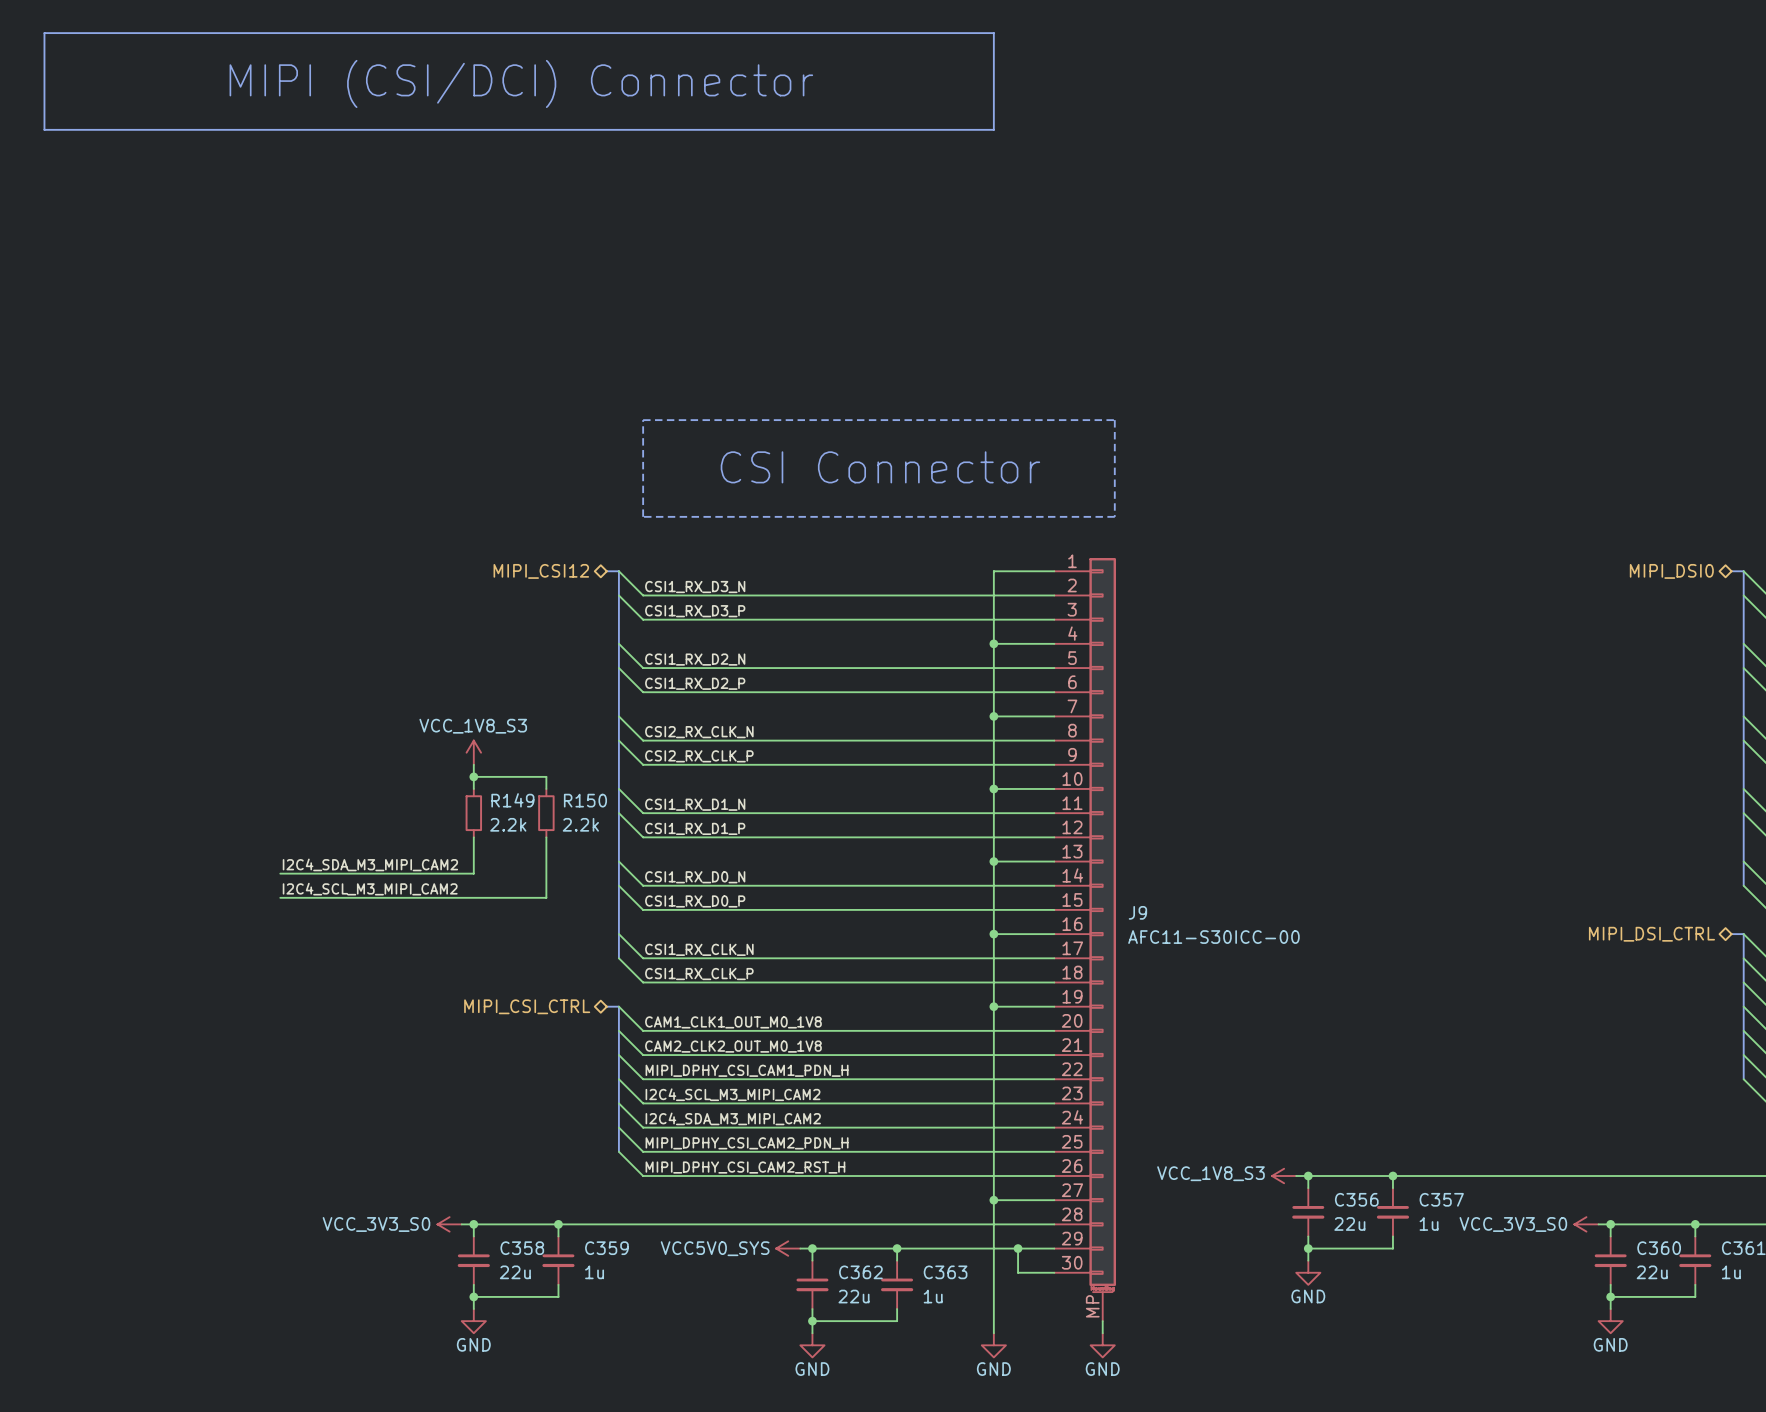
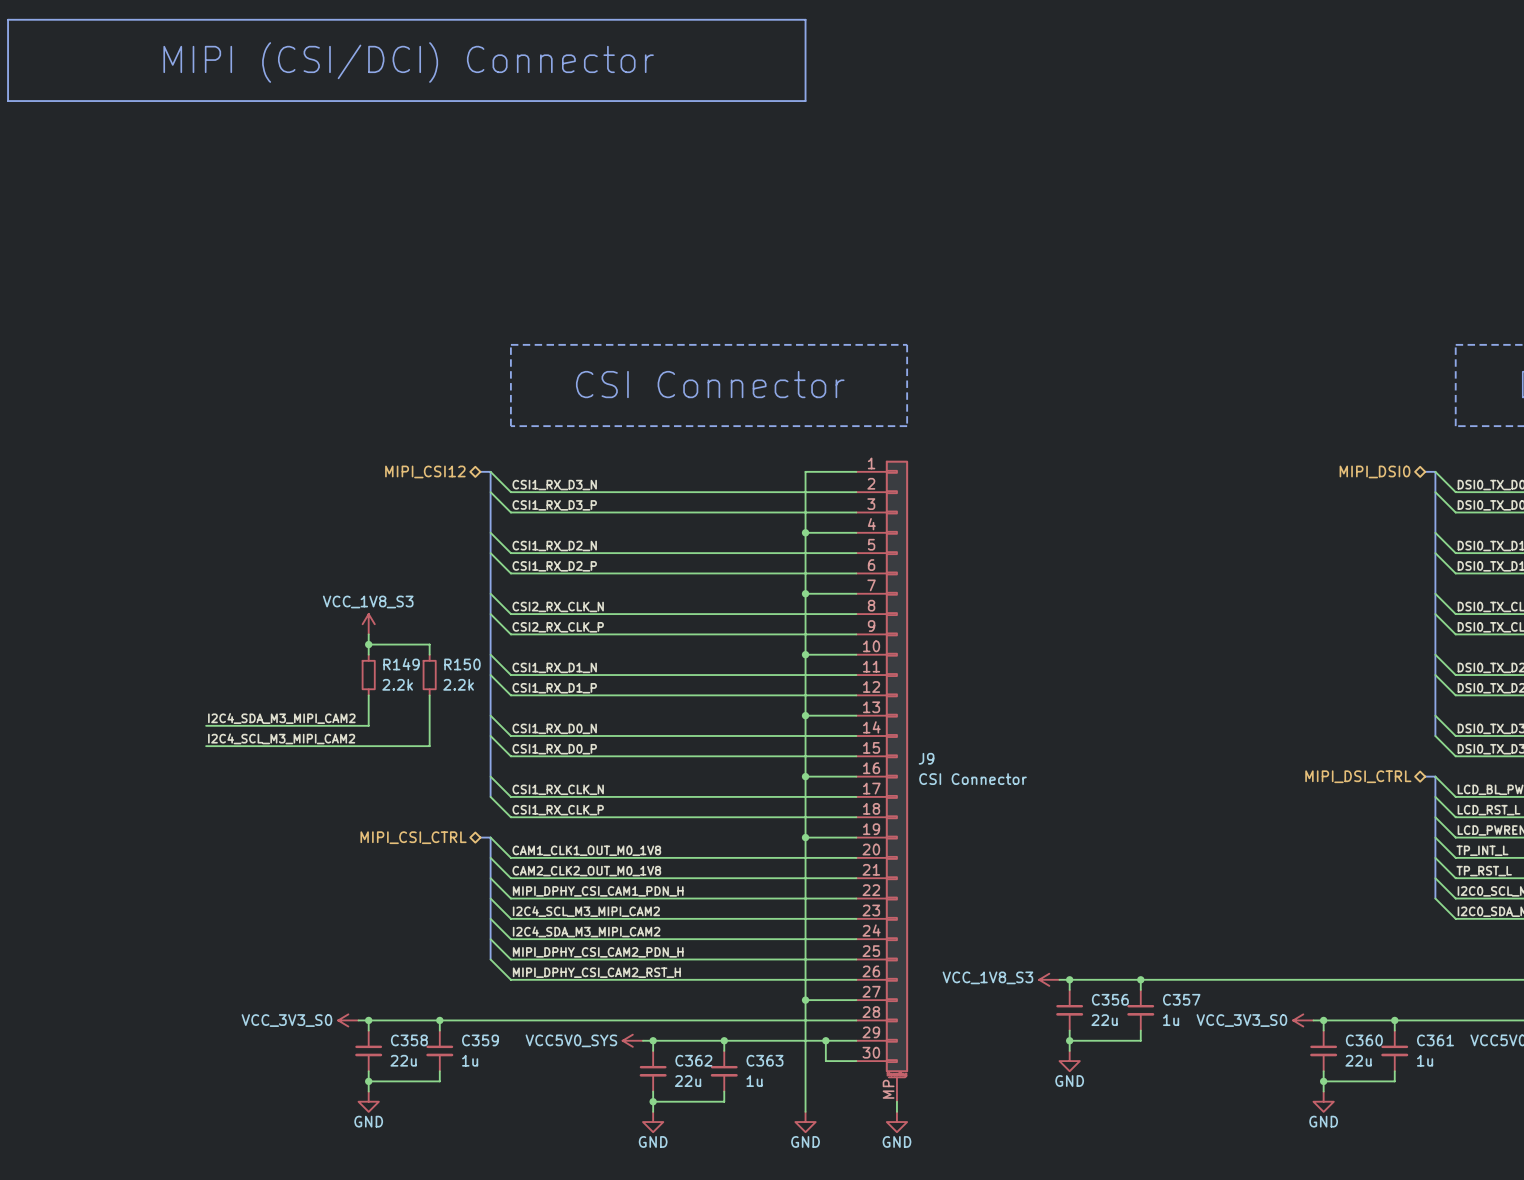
J9 value: AFC11-S30ICC-00 (1213, 937) -> CSI Connector (972, 779)

